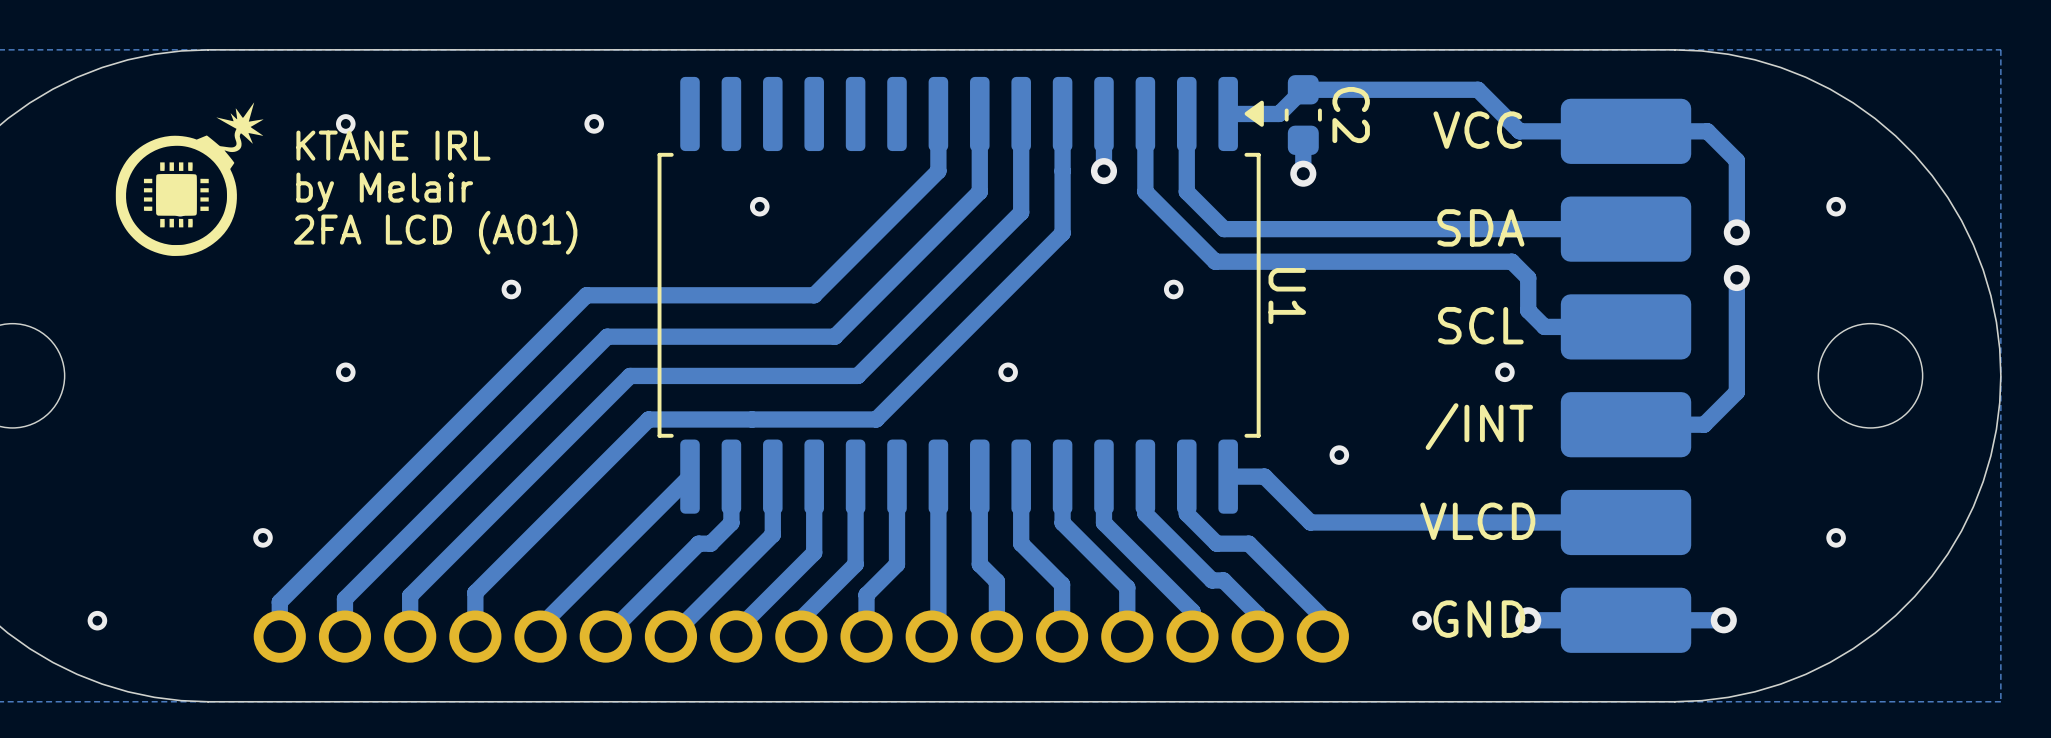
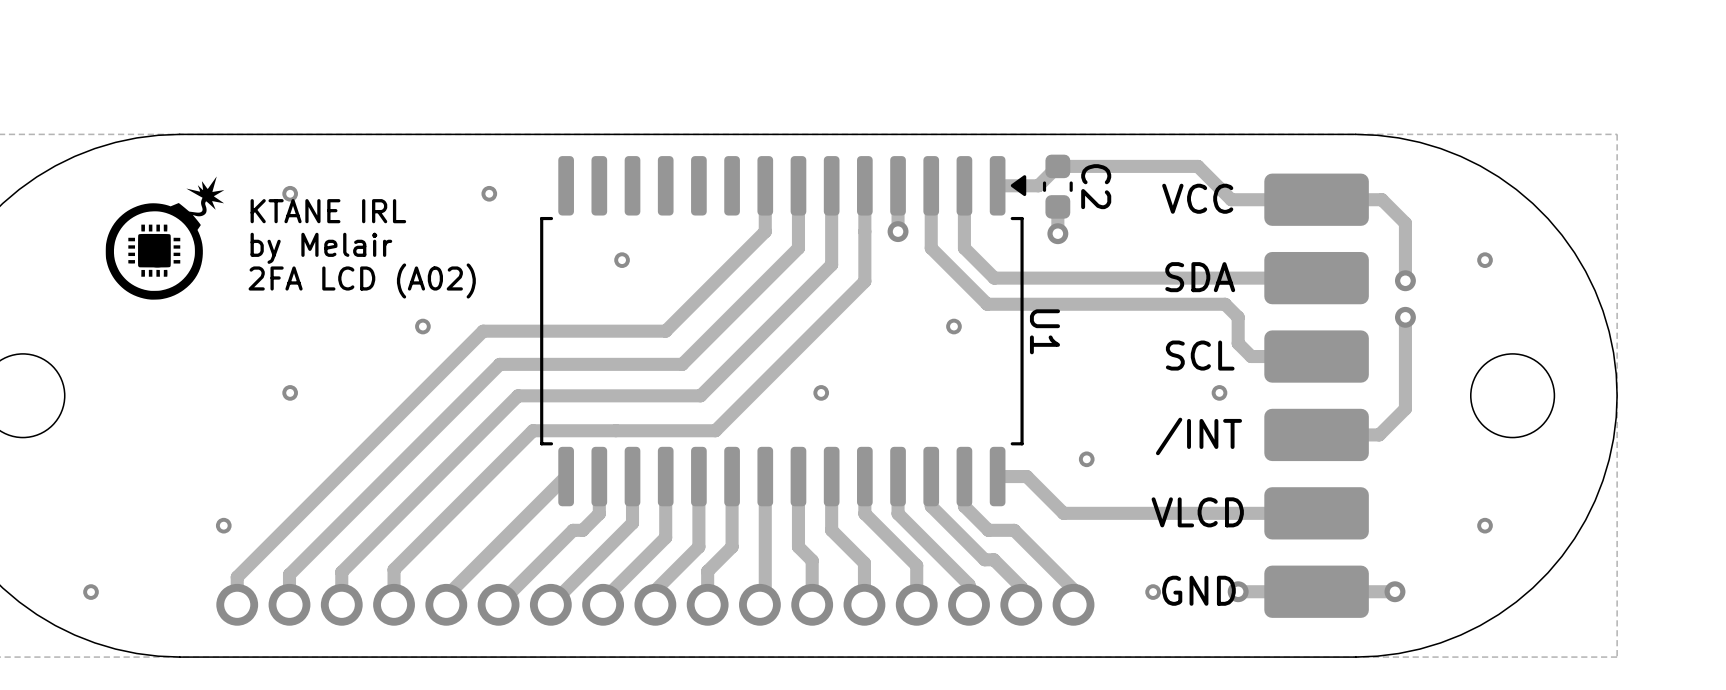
text: 2FA LCD (A01) (435, 232) -> 2FA LCD (A02) (362, 280)

